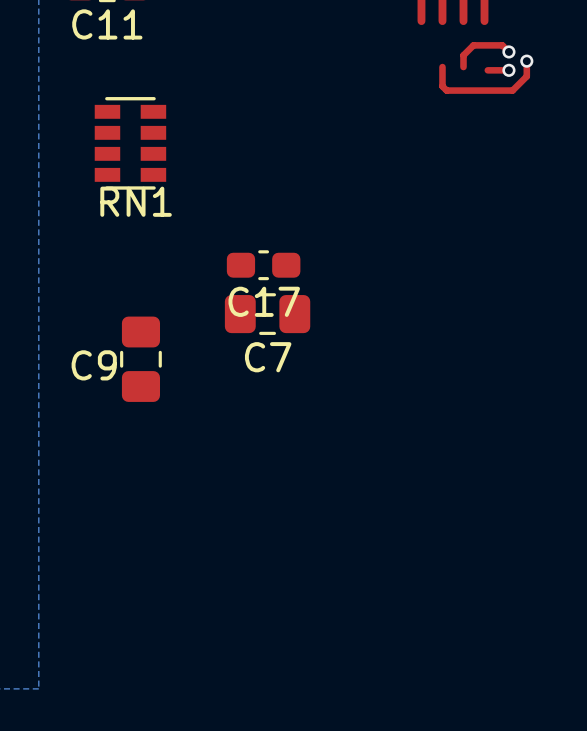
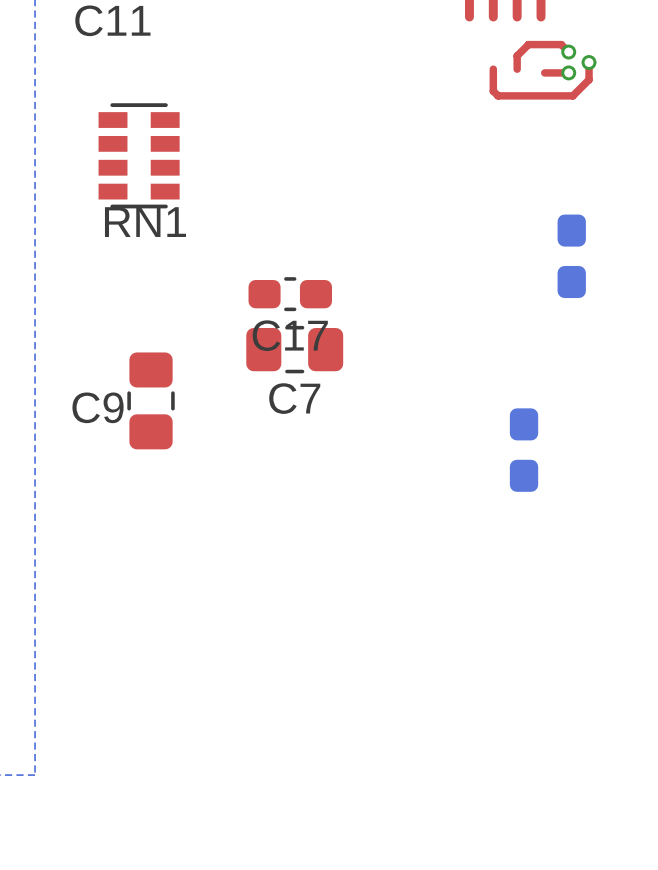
part: none -> (571, 256)
part: none -> (524, 450)

